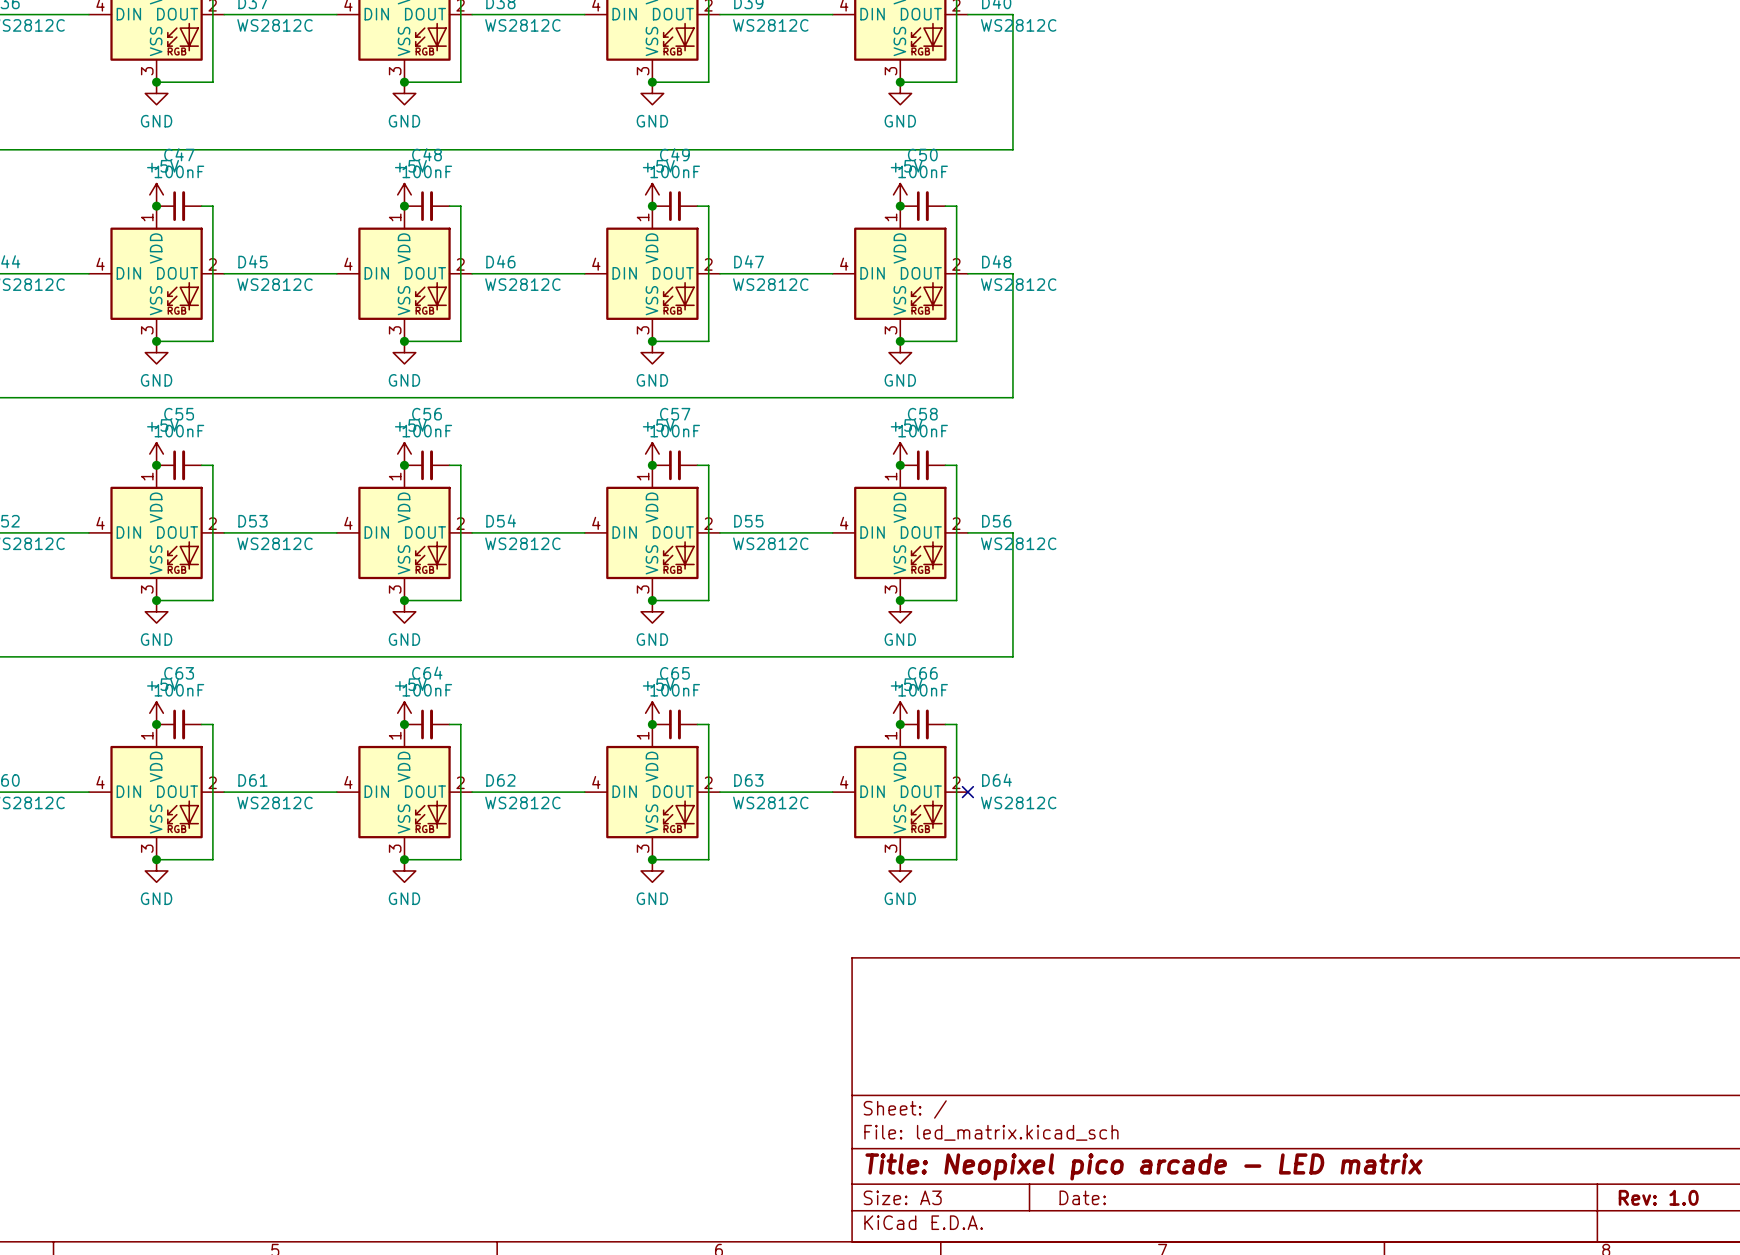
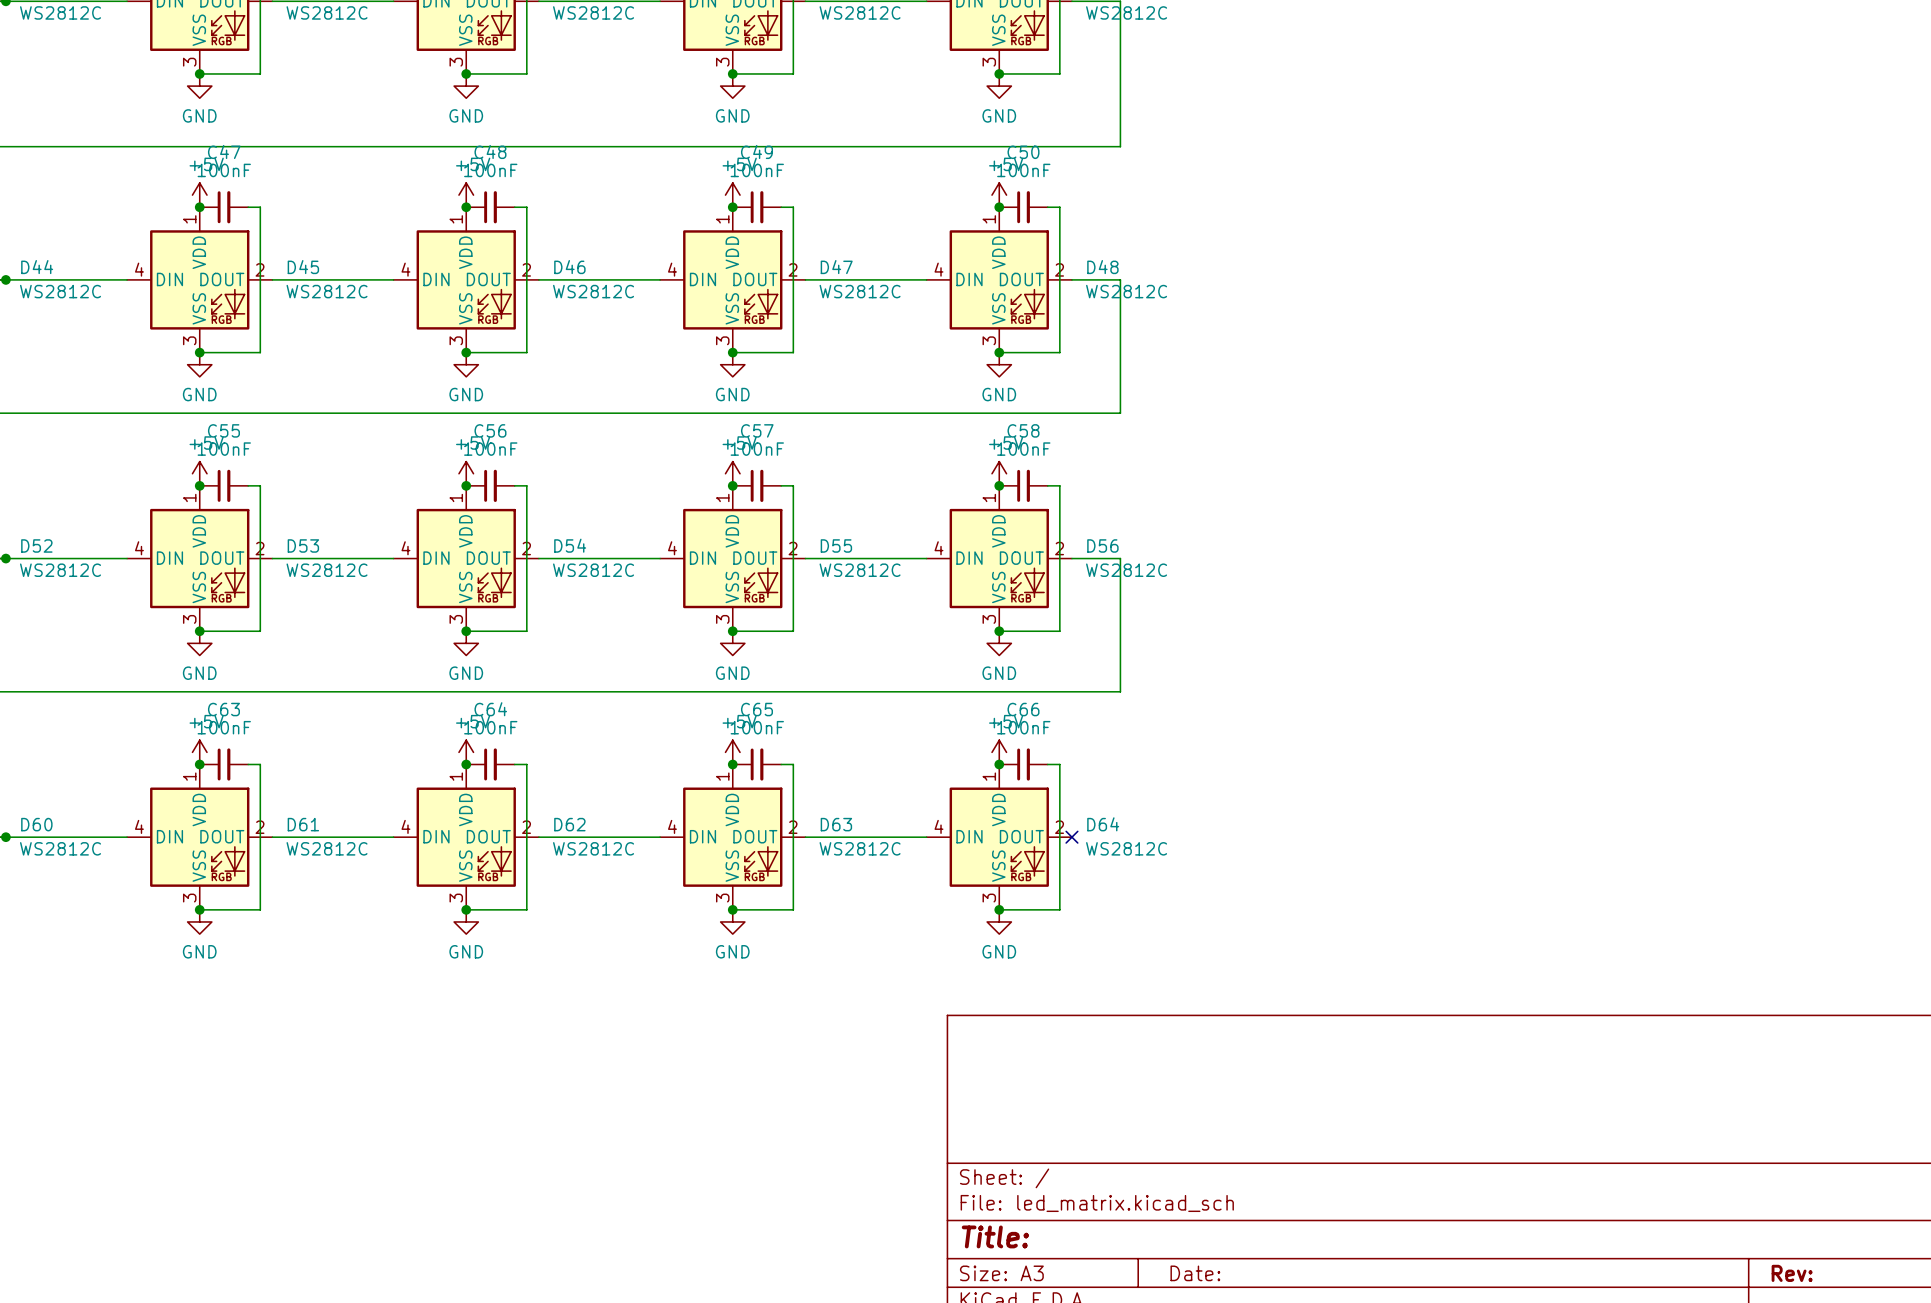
title block: Title: Neopixel pico arcade - LED matrix (1143, 1166) -> Title: (995, 1236)
title block: Rev: 1.0 (1658, 1197) -> Rev: (1792, 1273)

